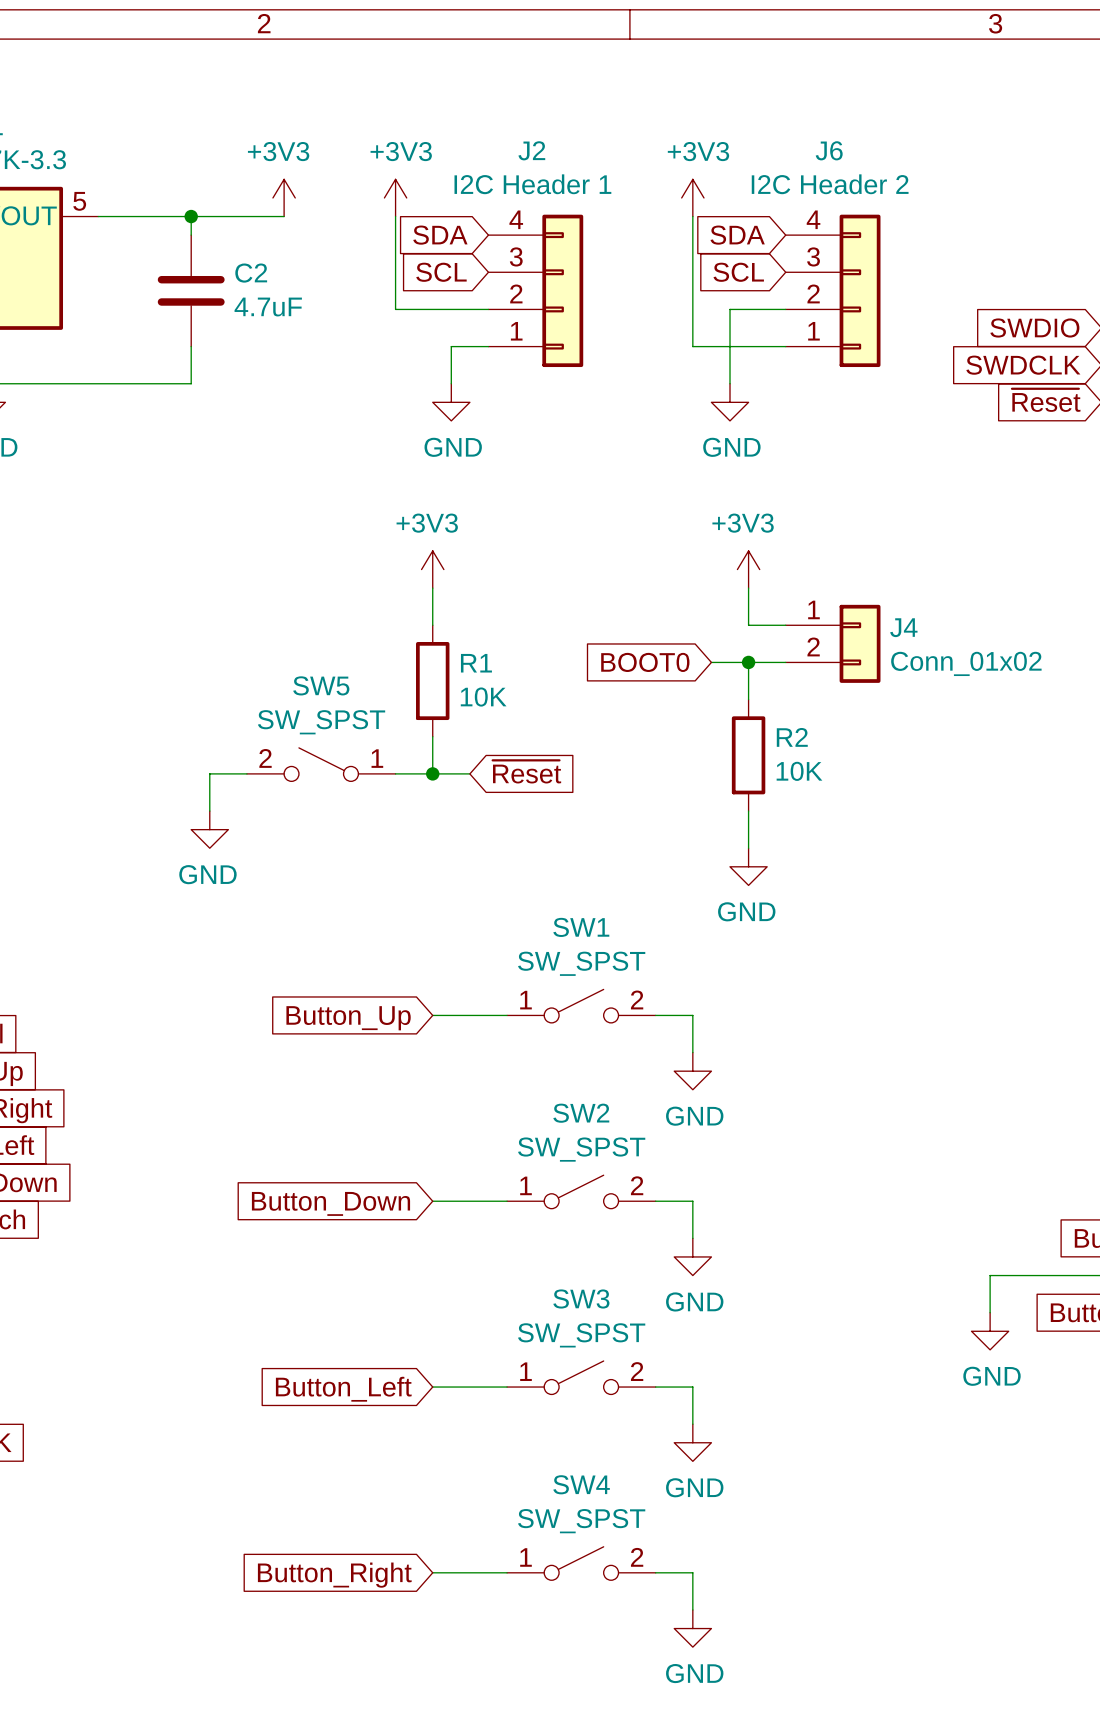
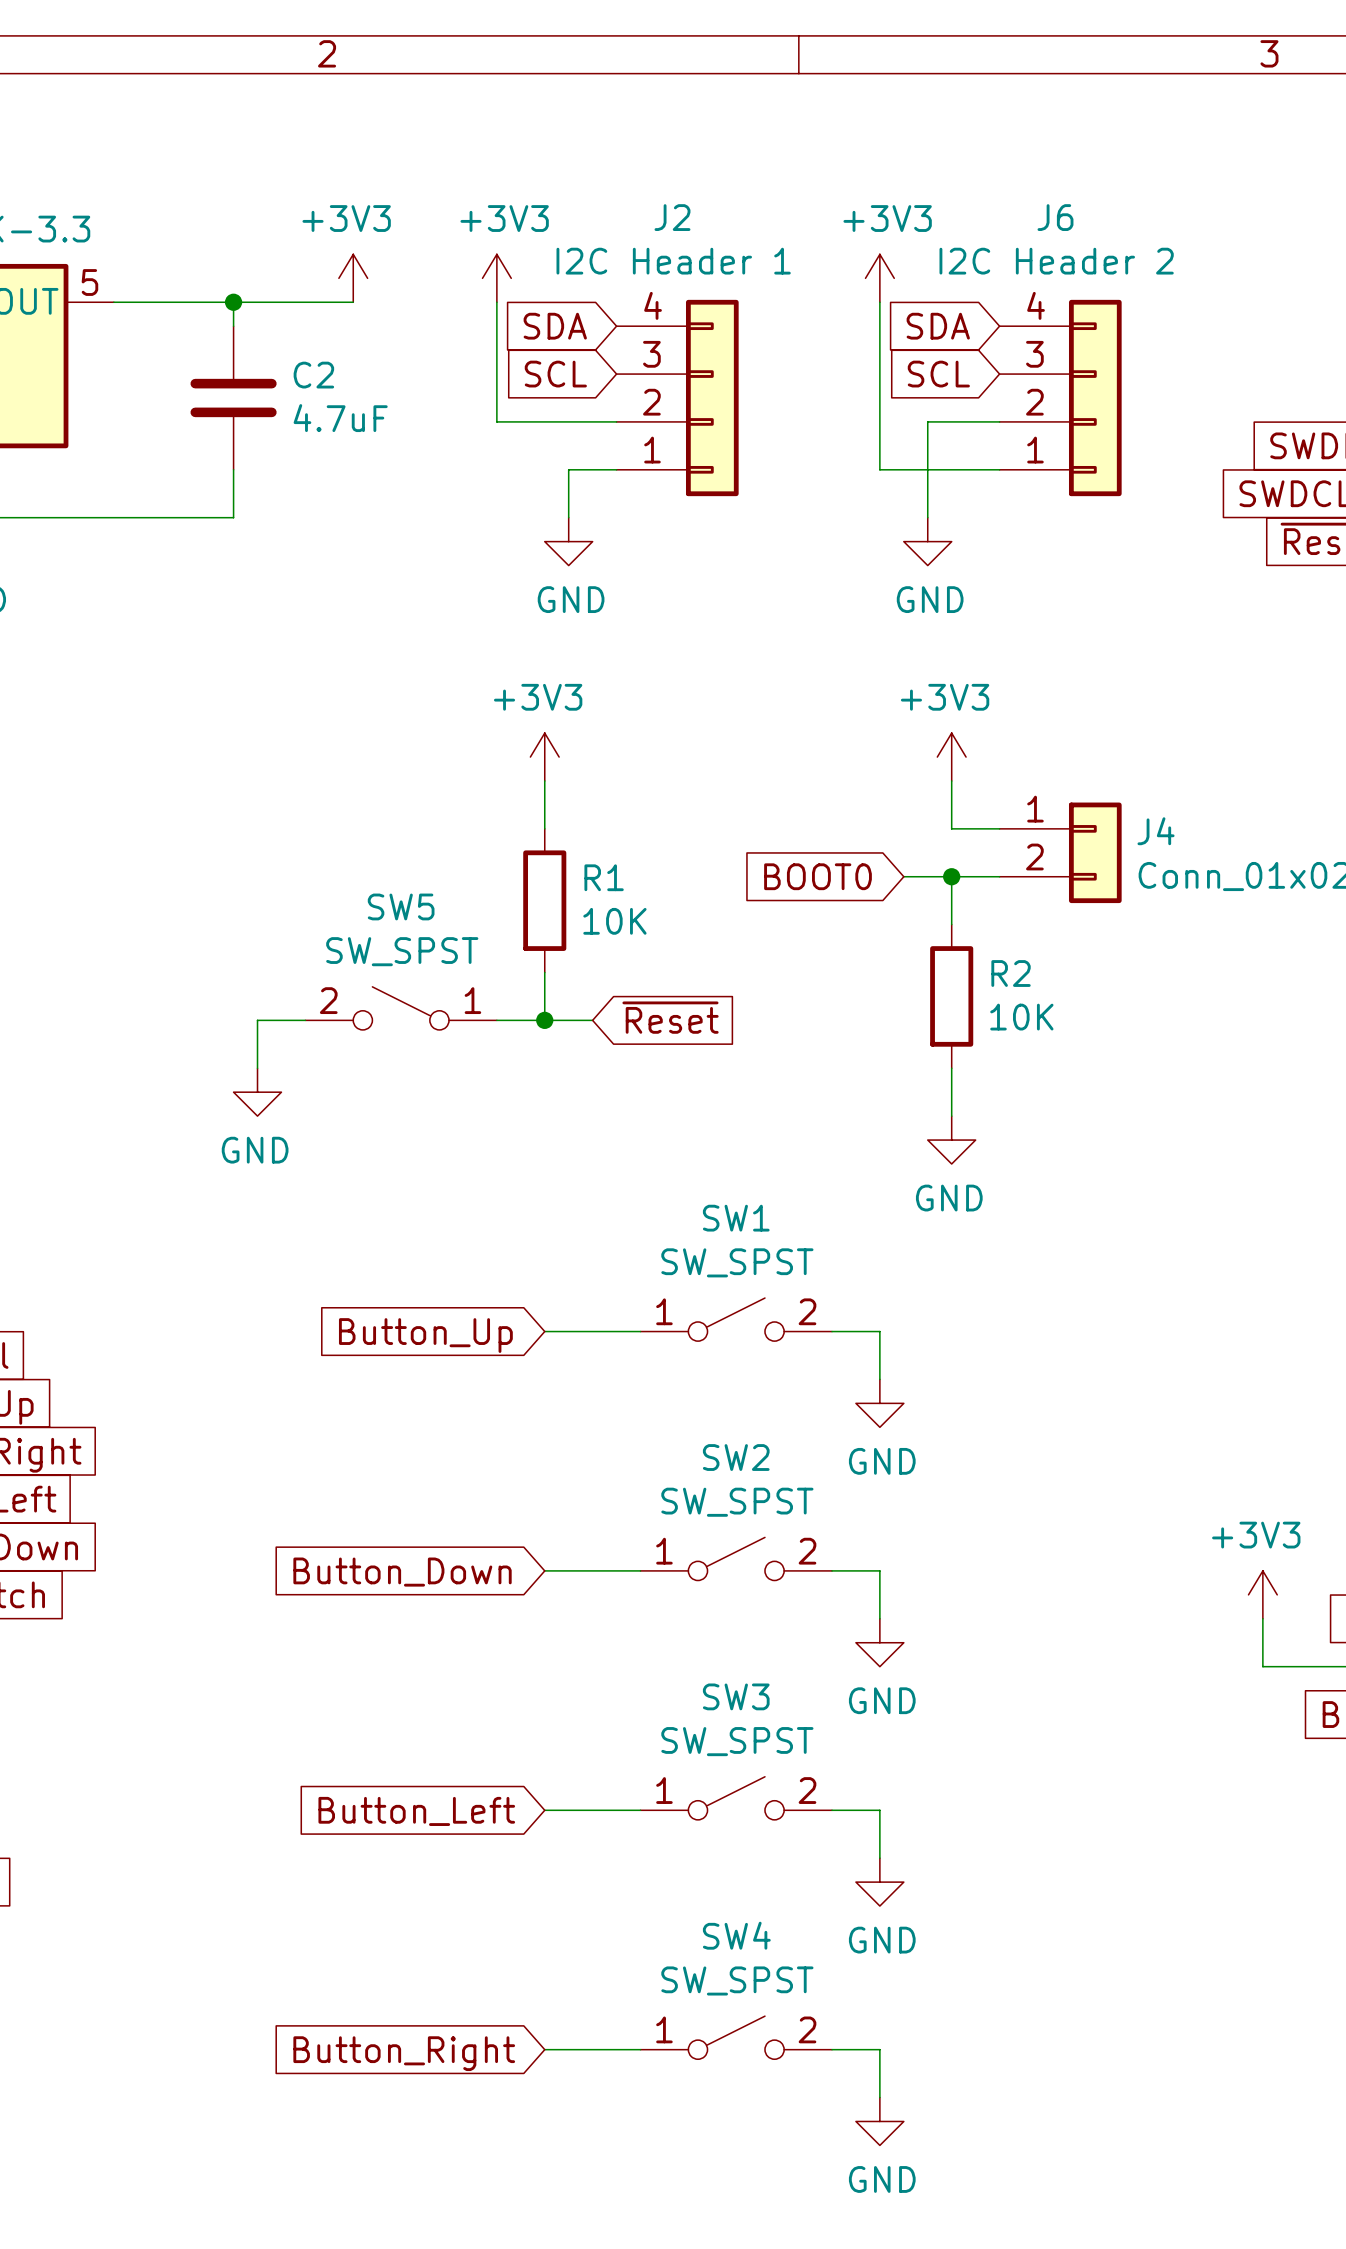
power symbol: none -> +3V3 (1262, 1594)
wire: (990, 1275) (990, 1312) -> (1262, 1666) (1262, 1618)
power symbol: GND (990, 1331) -> none

